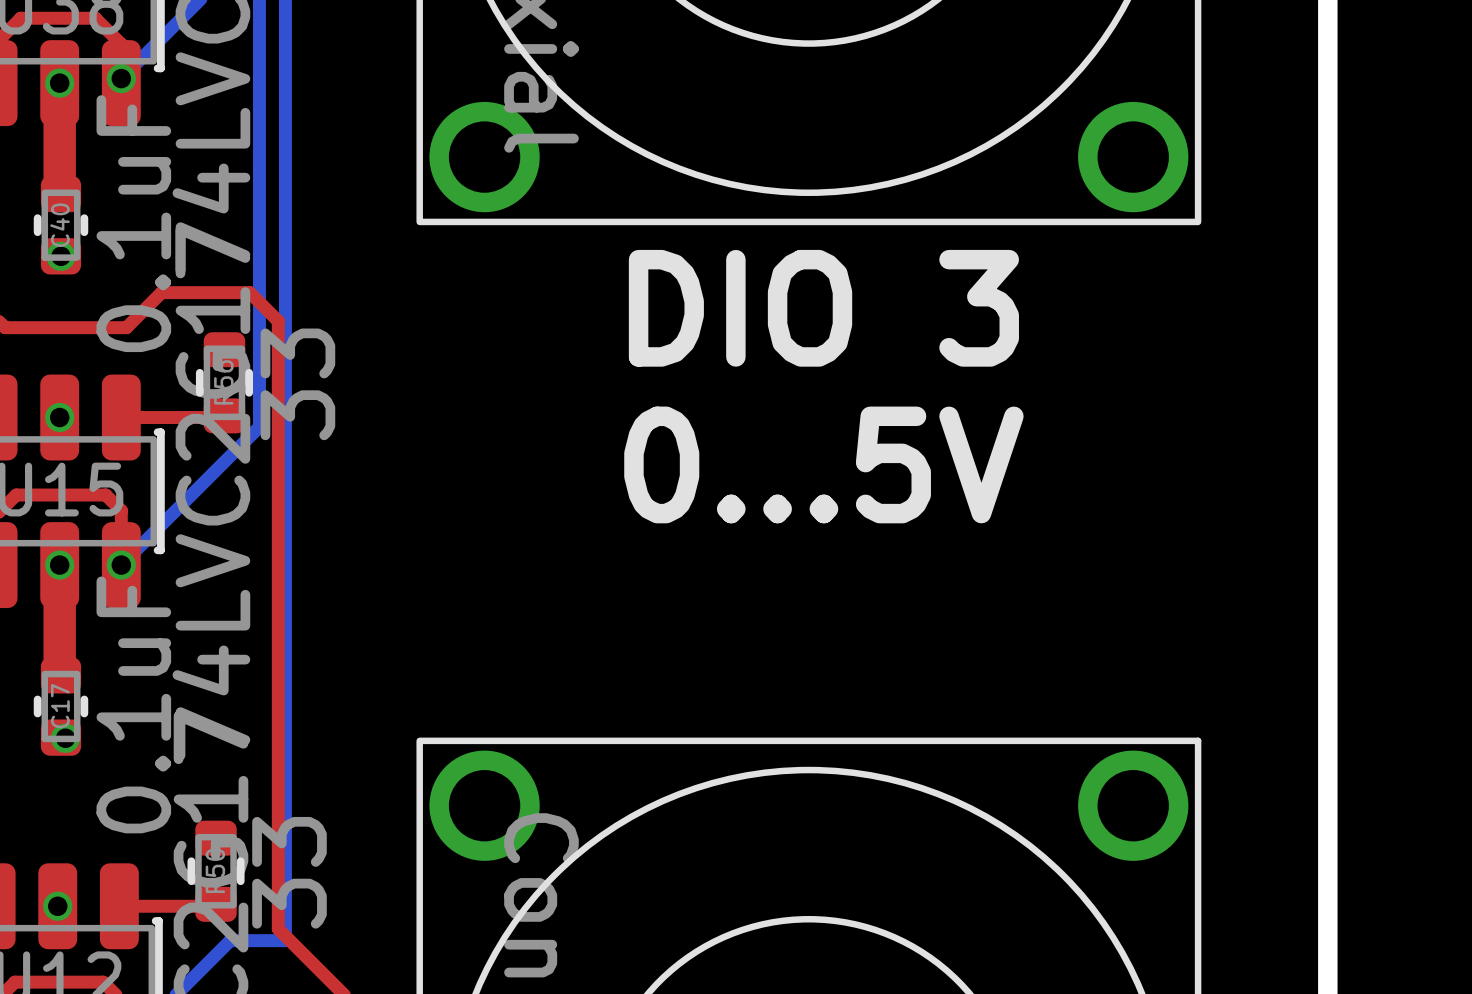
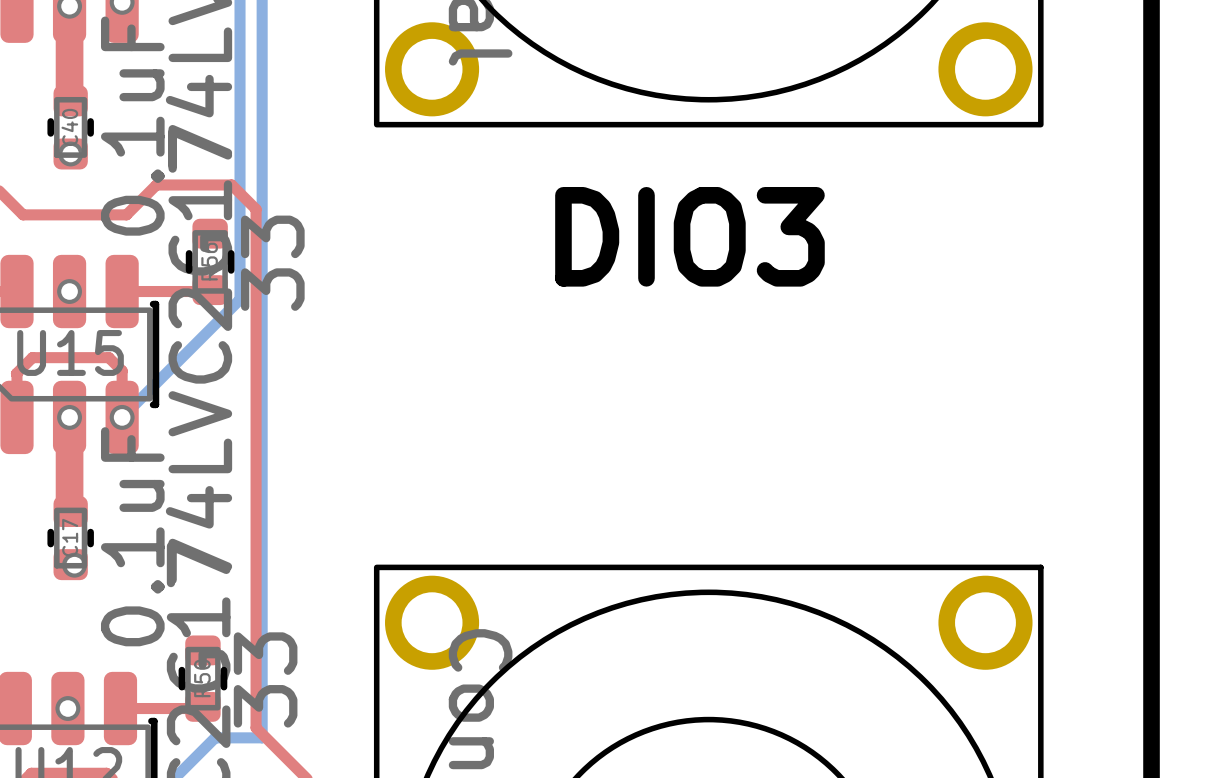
text: DIO 3 (823, 308) -> DIO3 (689, 236)
text: 0…5V (823, 464) -> none

